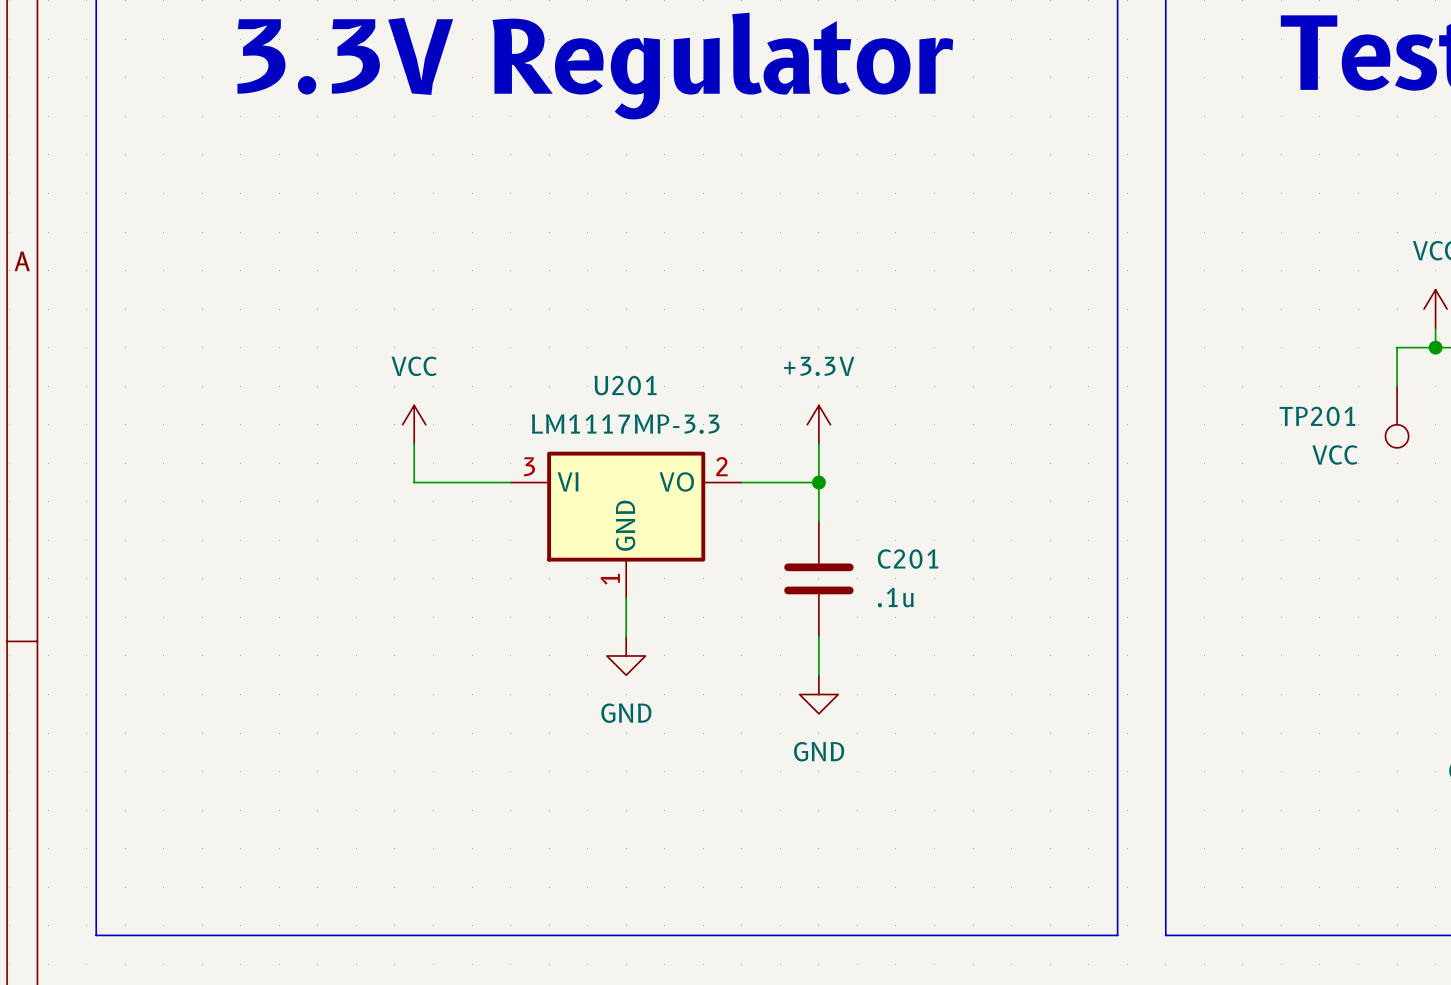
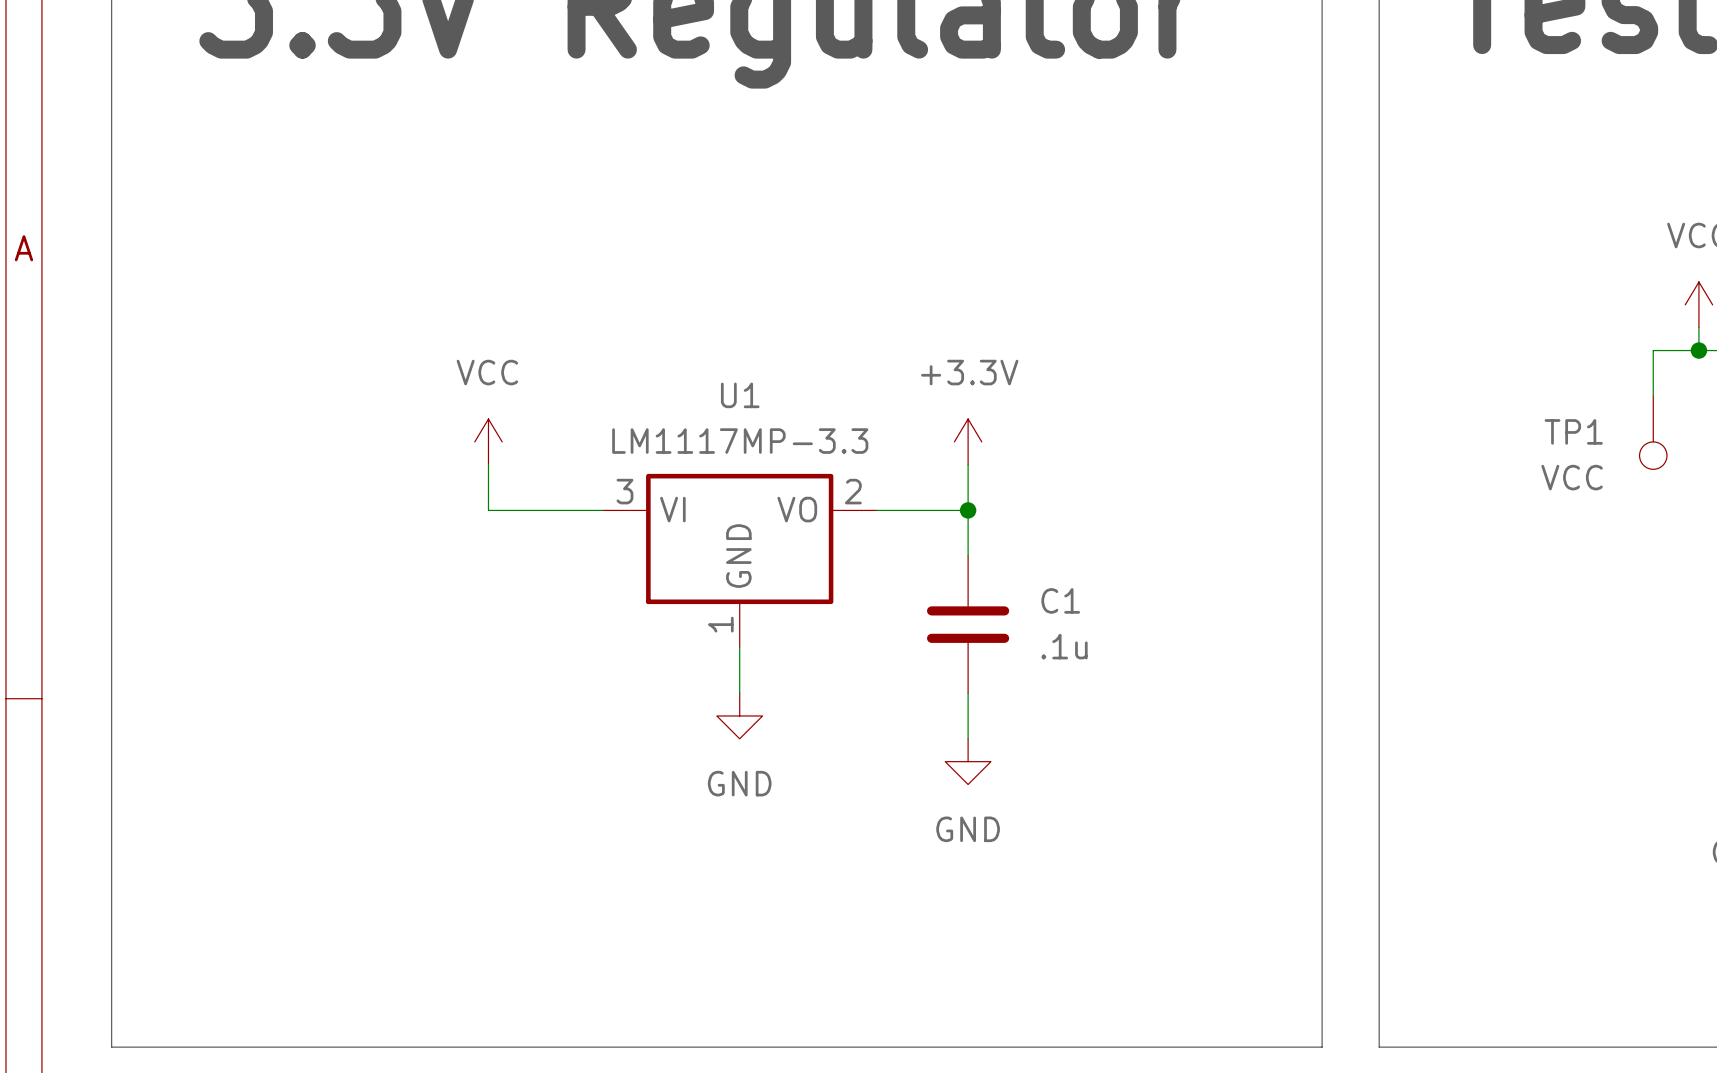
U201 name: U201 (625, 385) -> U1 (740, 395)
TP201 name: TP201 (1317, 416) -> TP1 (1573, 431)
C201 name: C201 (908, 559) -> C1 (1060, 600)

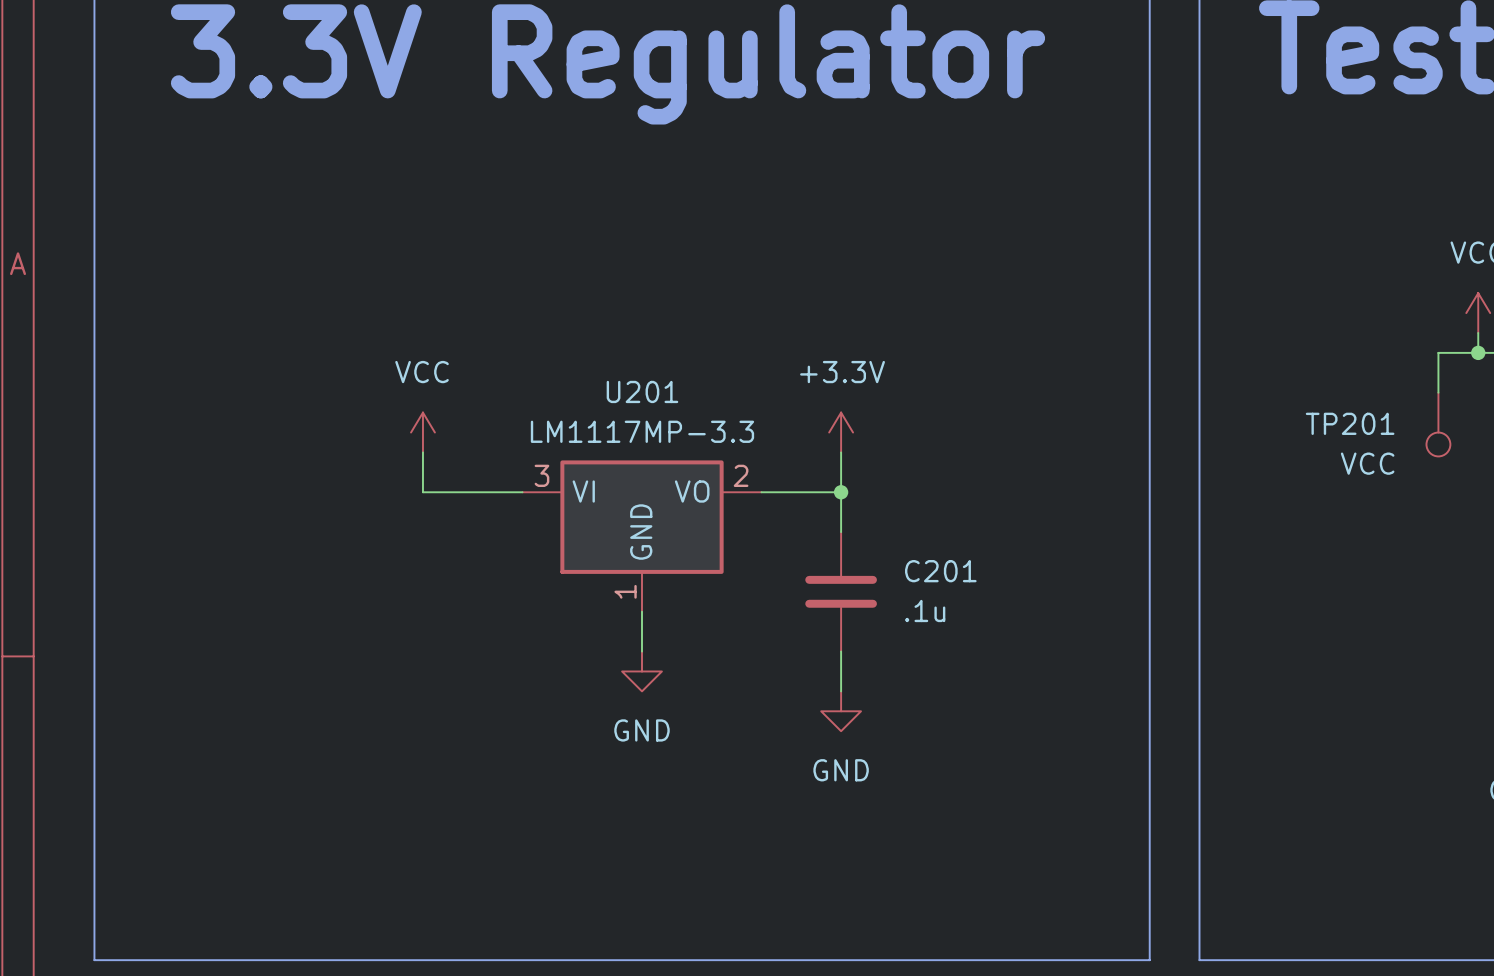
U1 name: U1 (740, 395) -> U201 (642, 391)
TP1 name: TP1 (1573, 431) -> TP201 (1350, 423)
C1 name: C1 (1060, 600) -> C201 (940, 571)

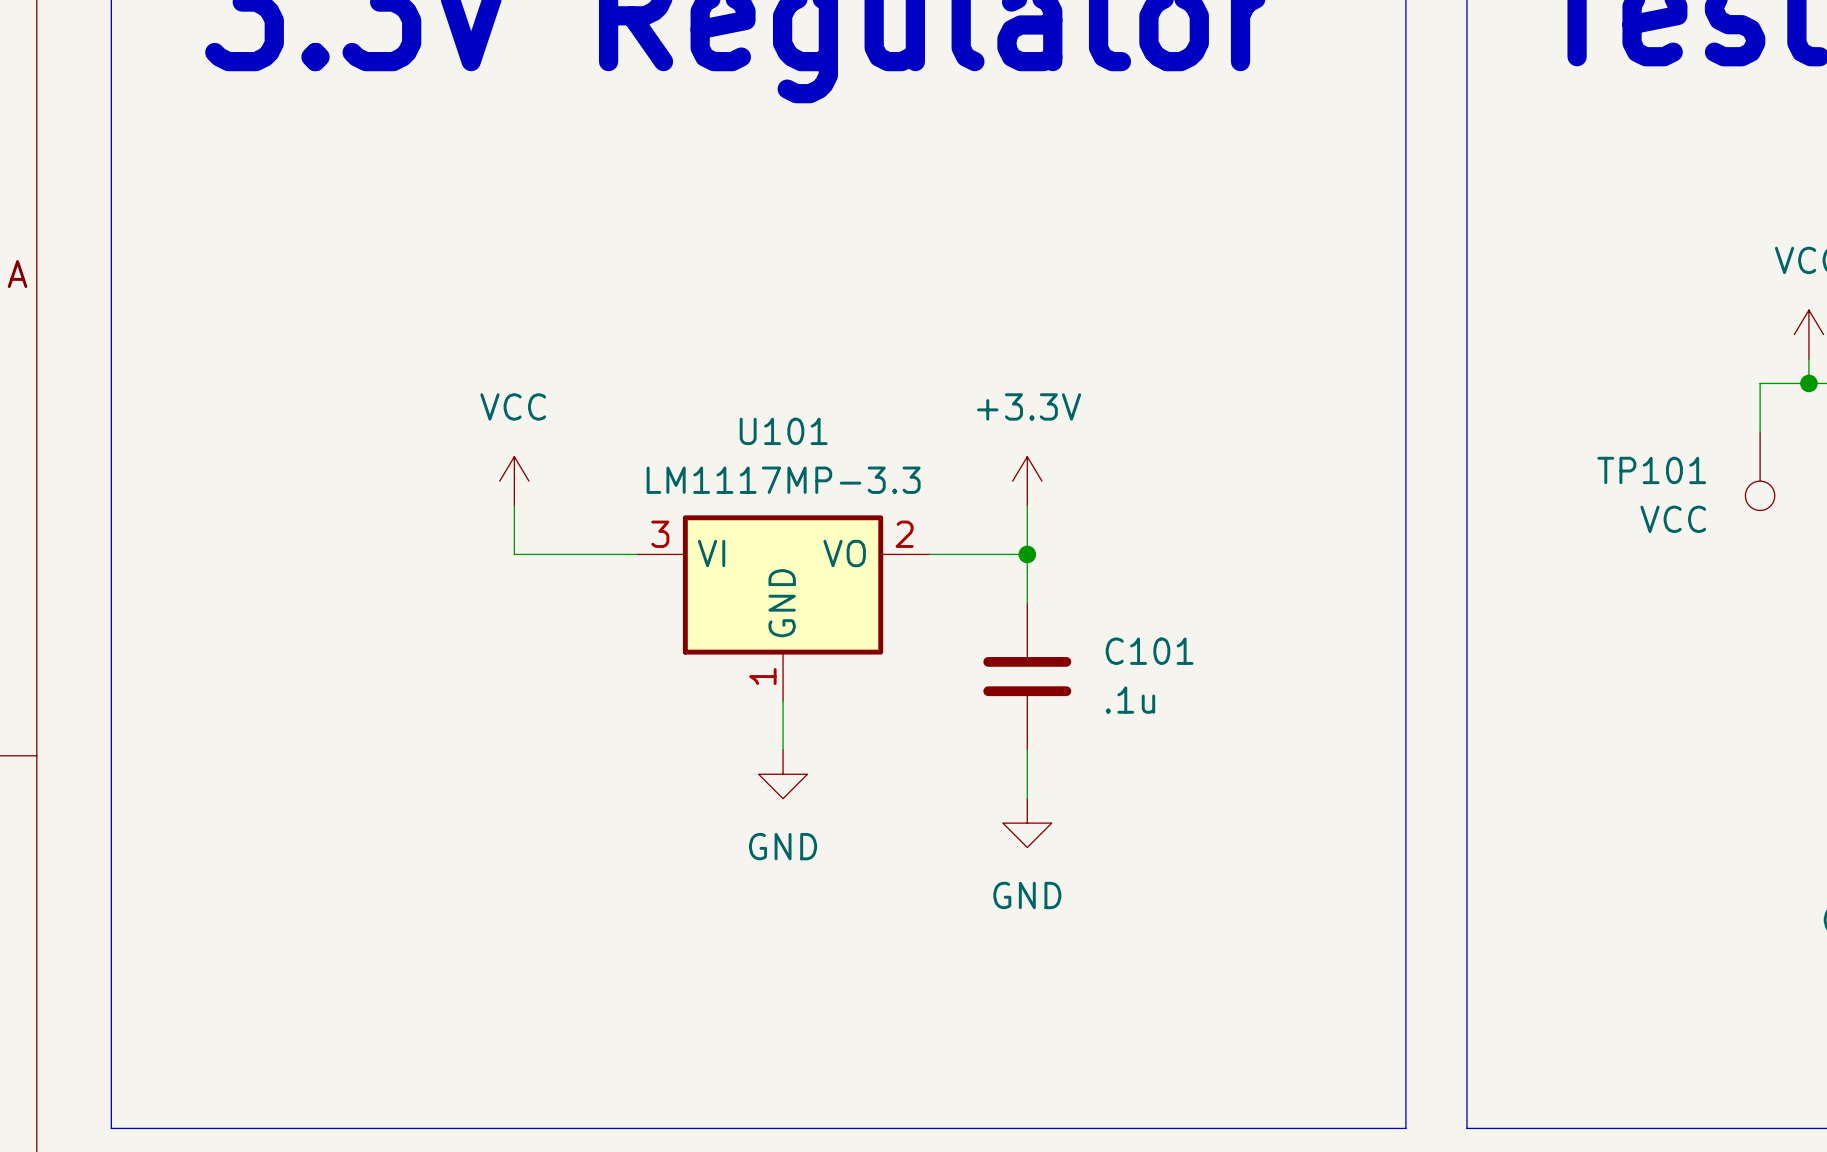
U201 name: U201 (642, 391) -> U101 (783, 431)
TP201 name: TP201 (1350, 423) -> TP101 (1651, 470)
C201 name: C201 (940, 571) -> C101 (1149, 651)

